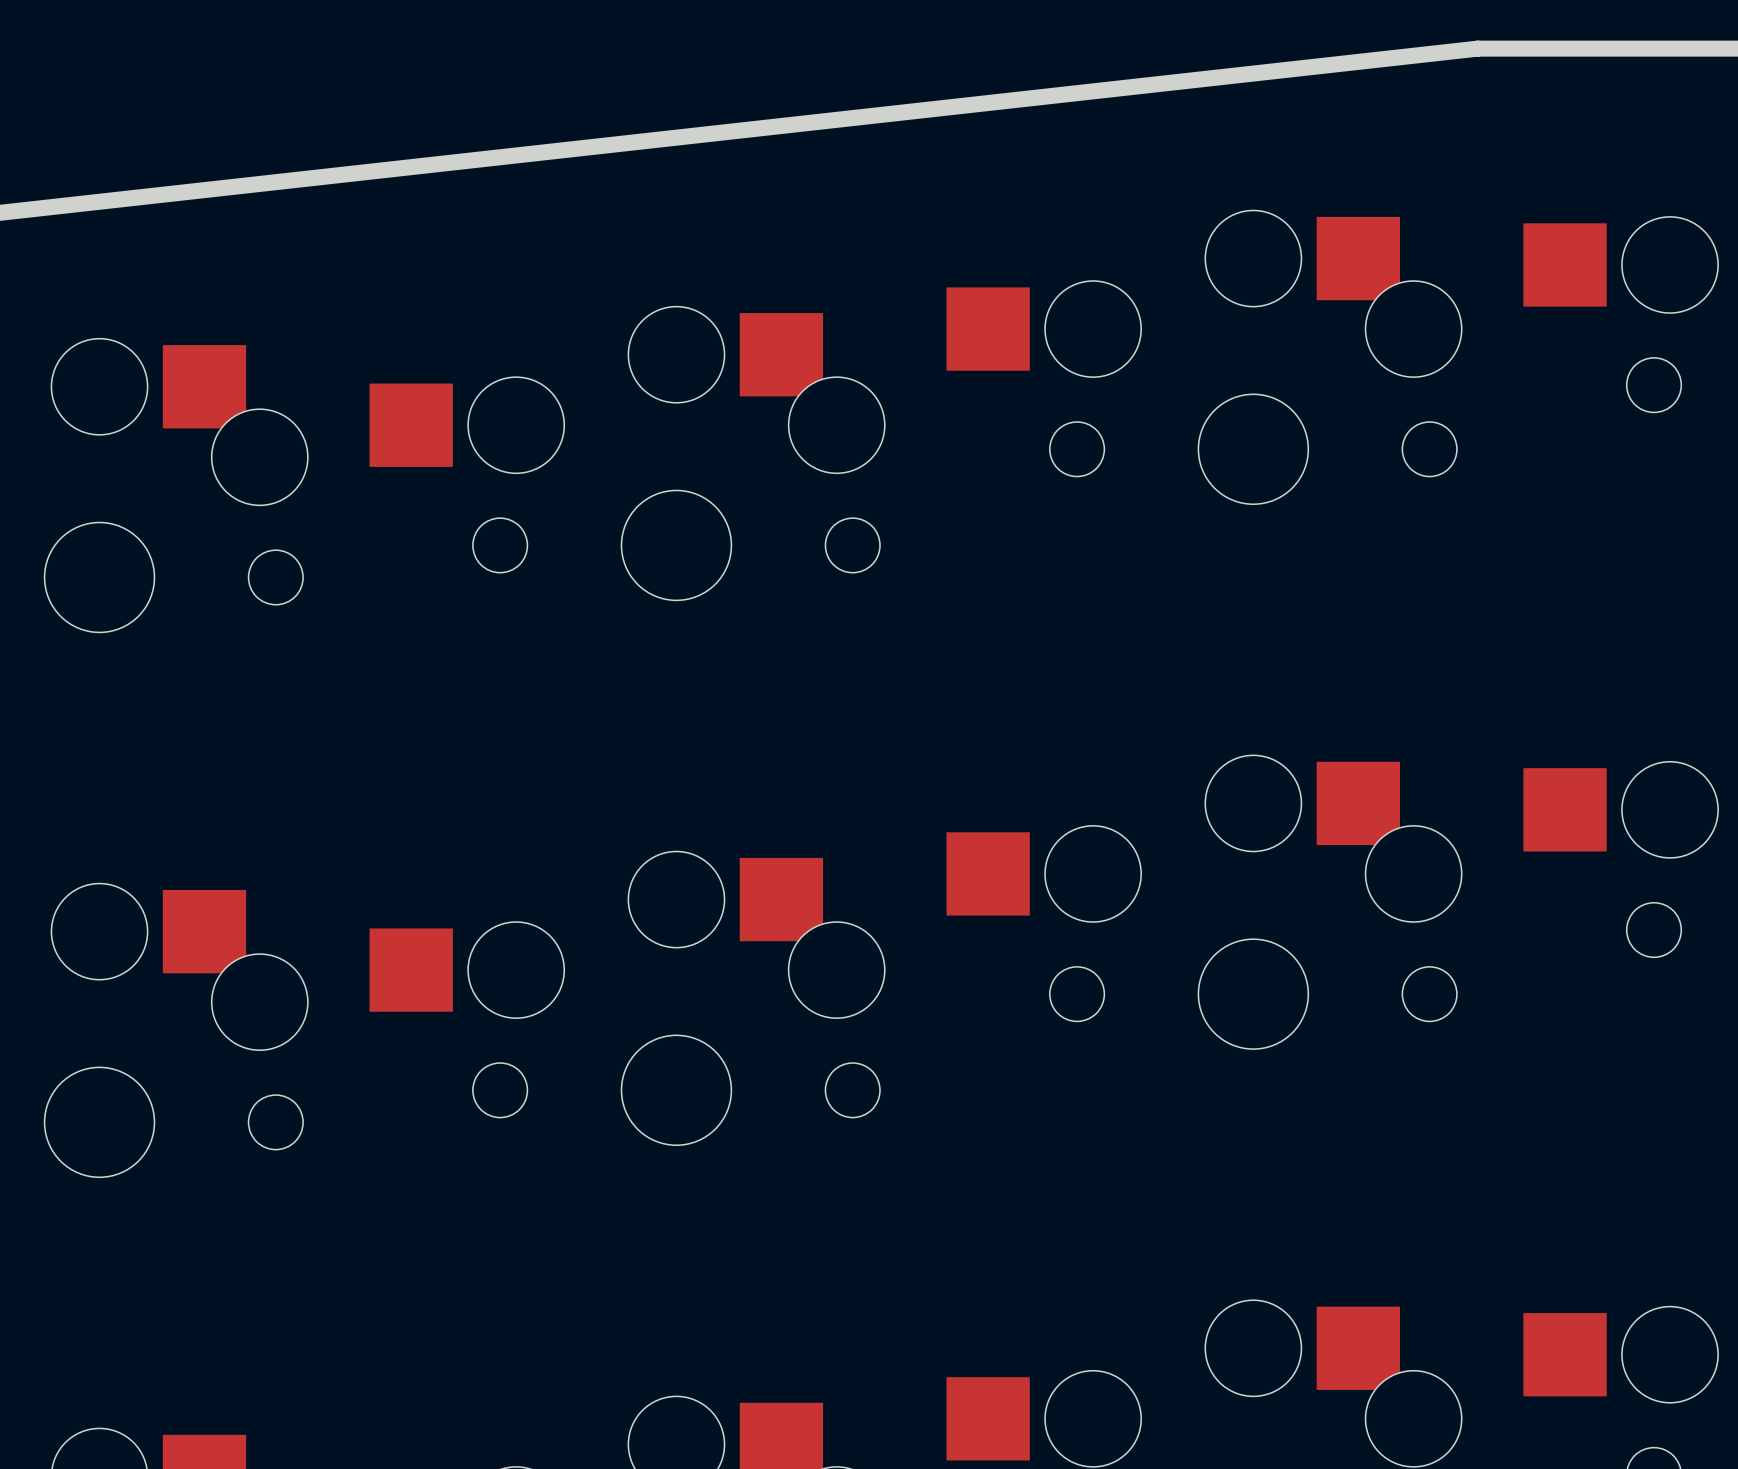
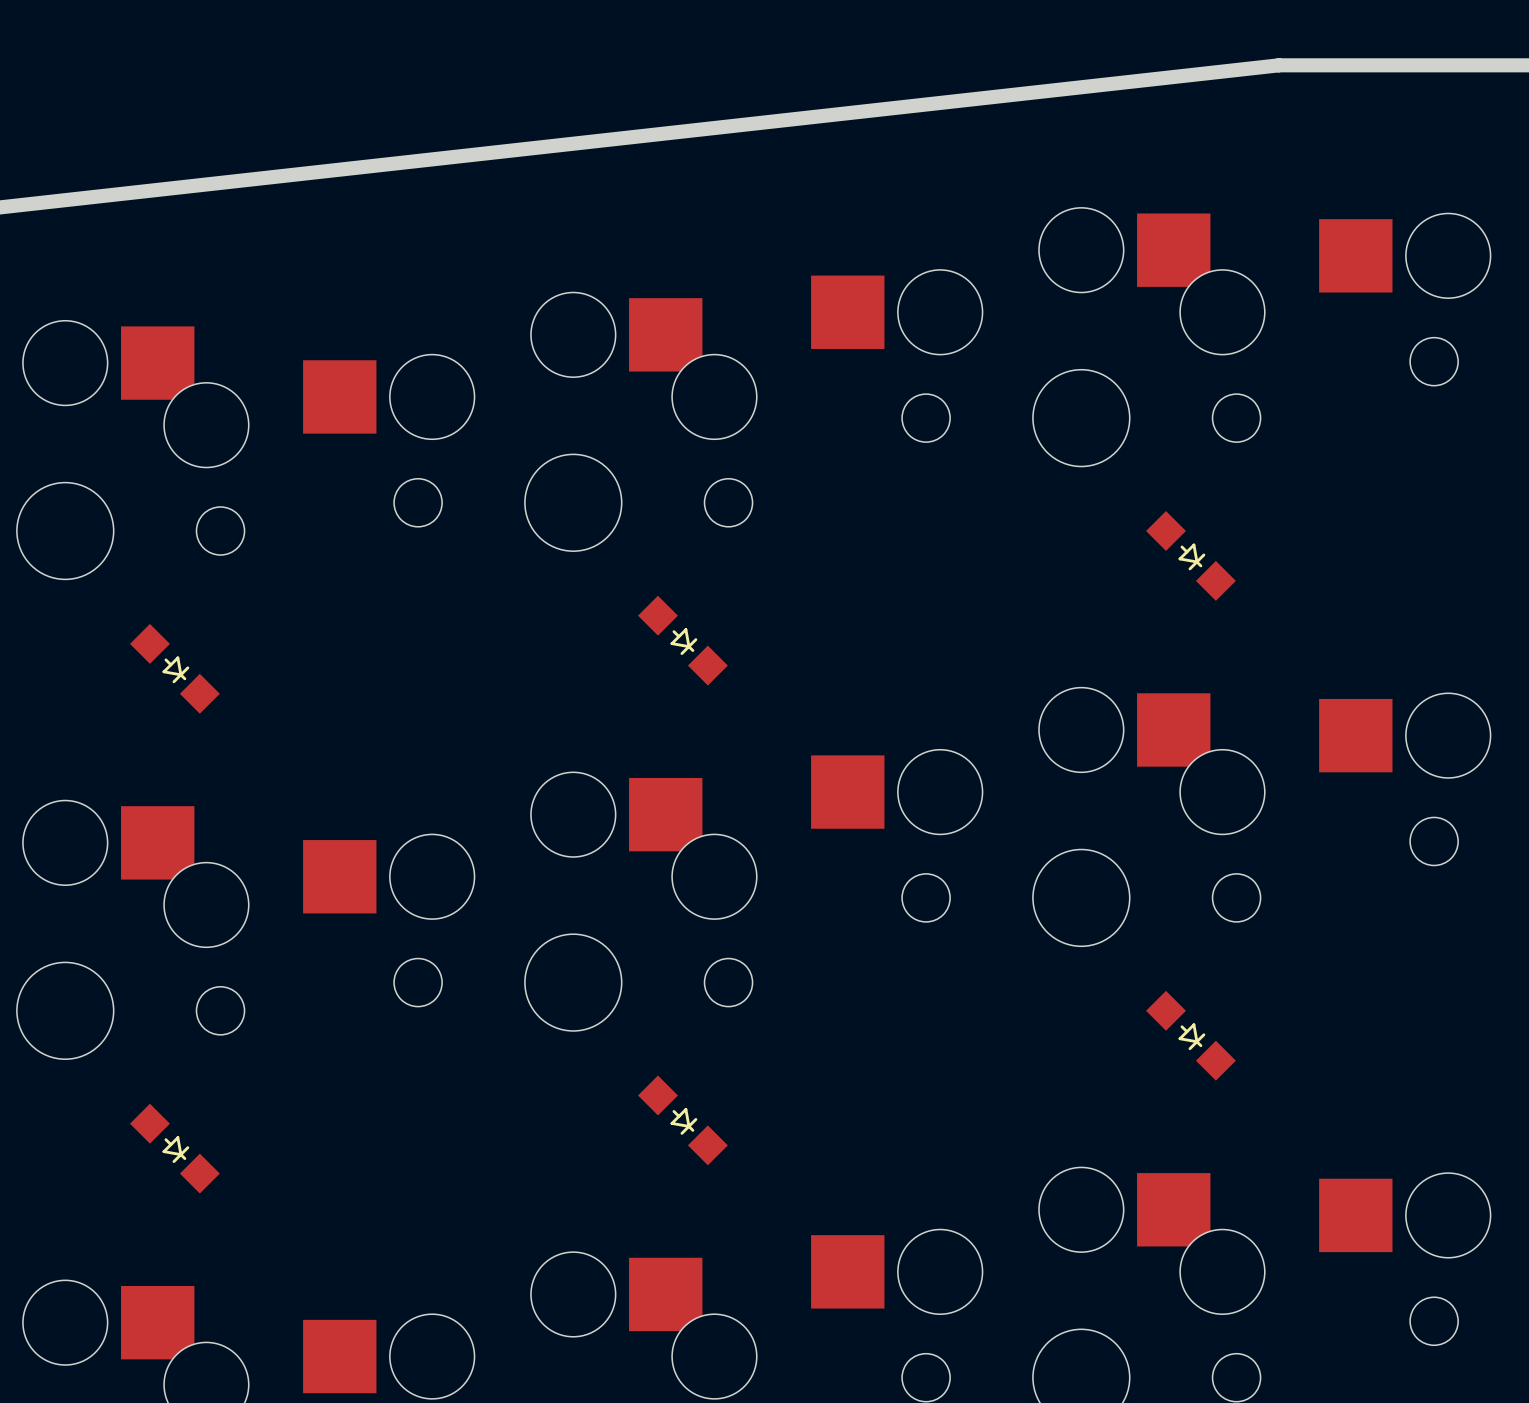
part: none -> (1190, 555)
part: none -> (682, 640)
part: none -> (174, 668)
part: none -> (1190, 1035)
part: none -> (682, 1120)
part: none -> (174, 1148)

